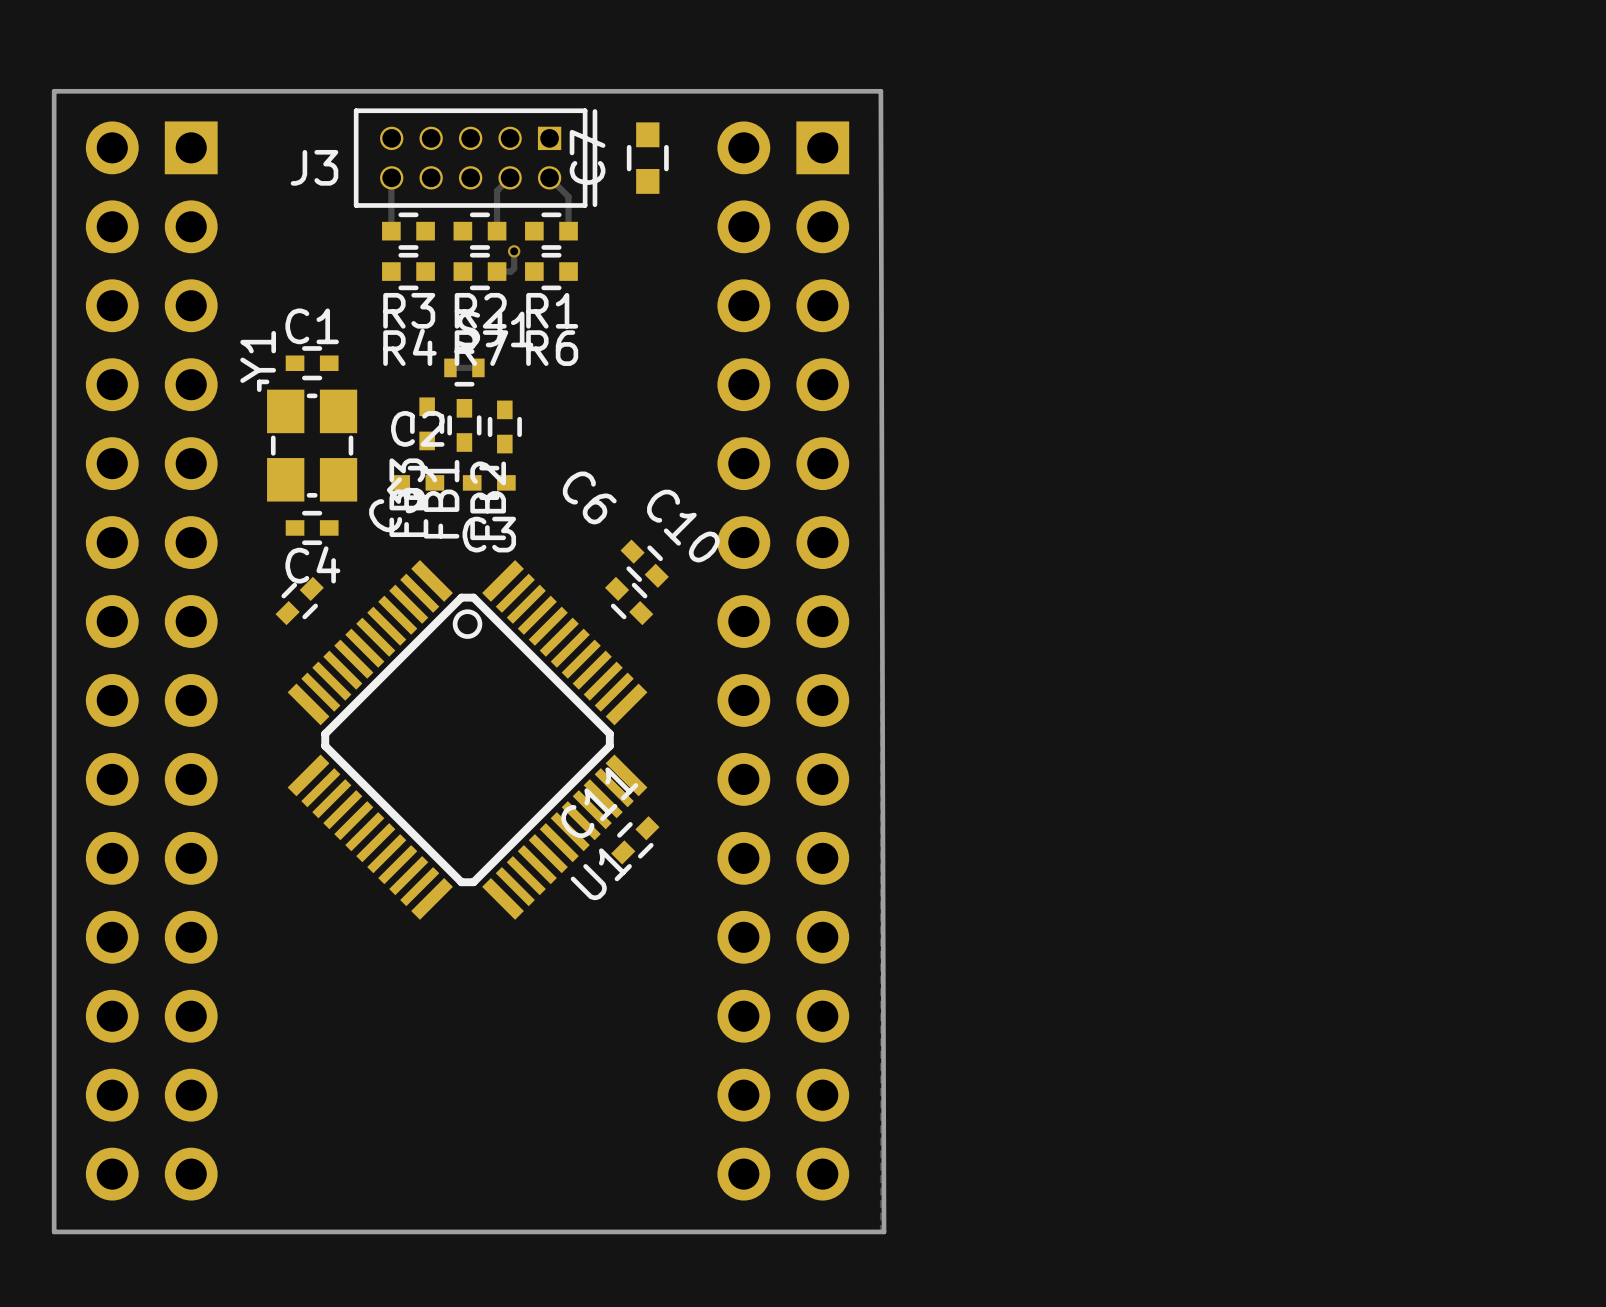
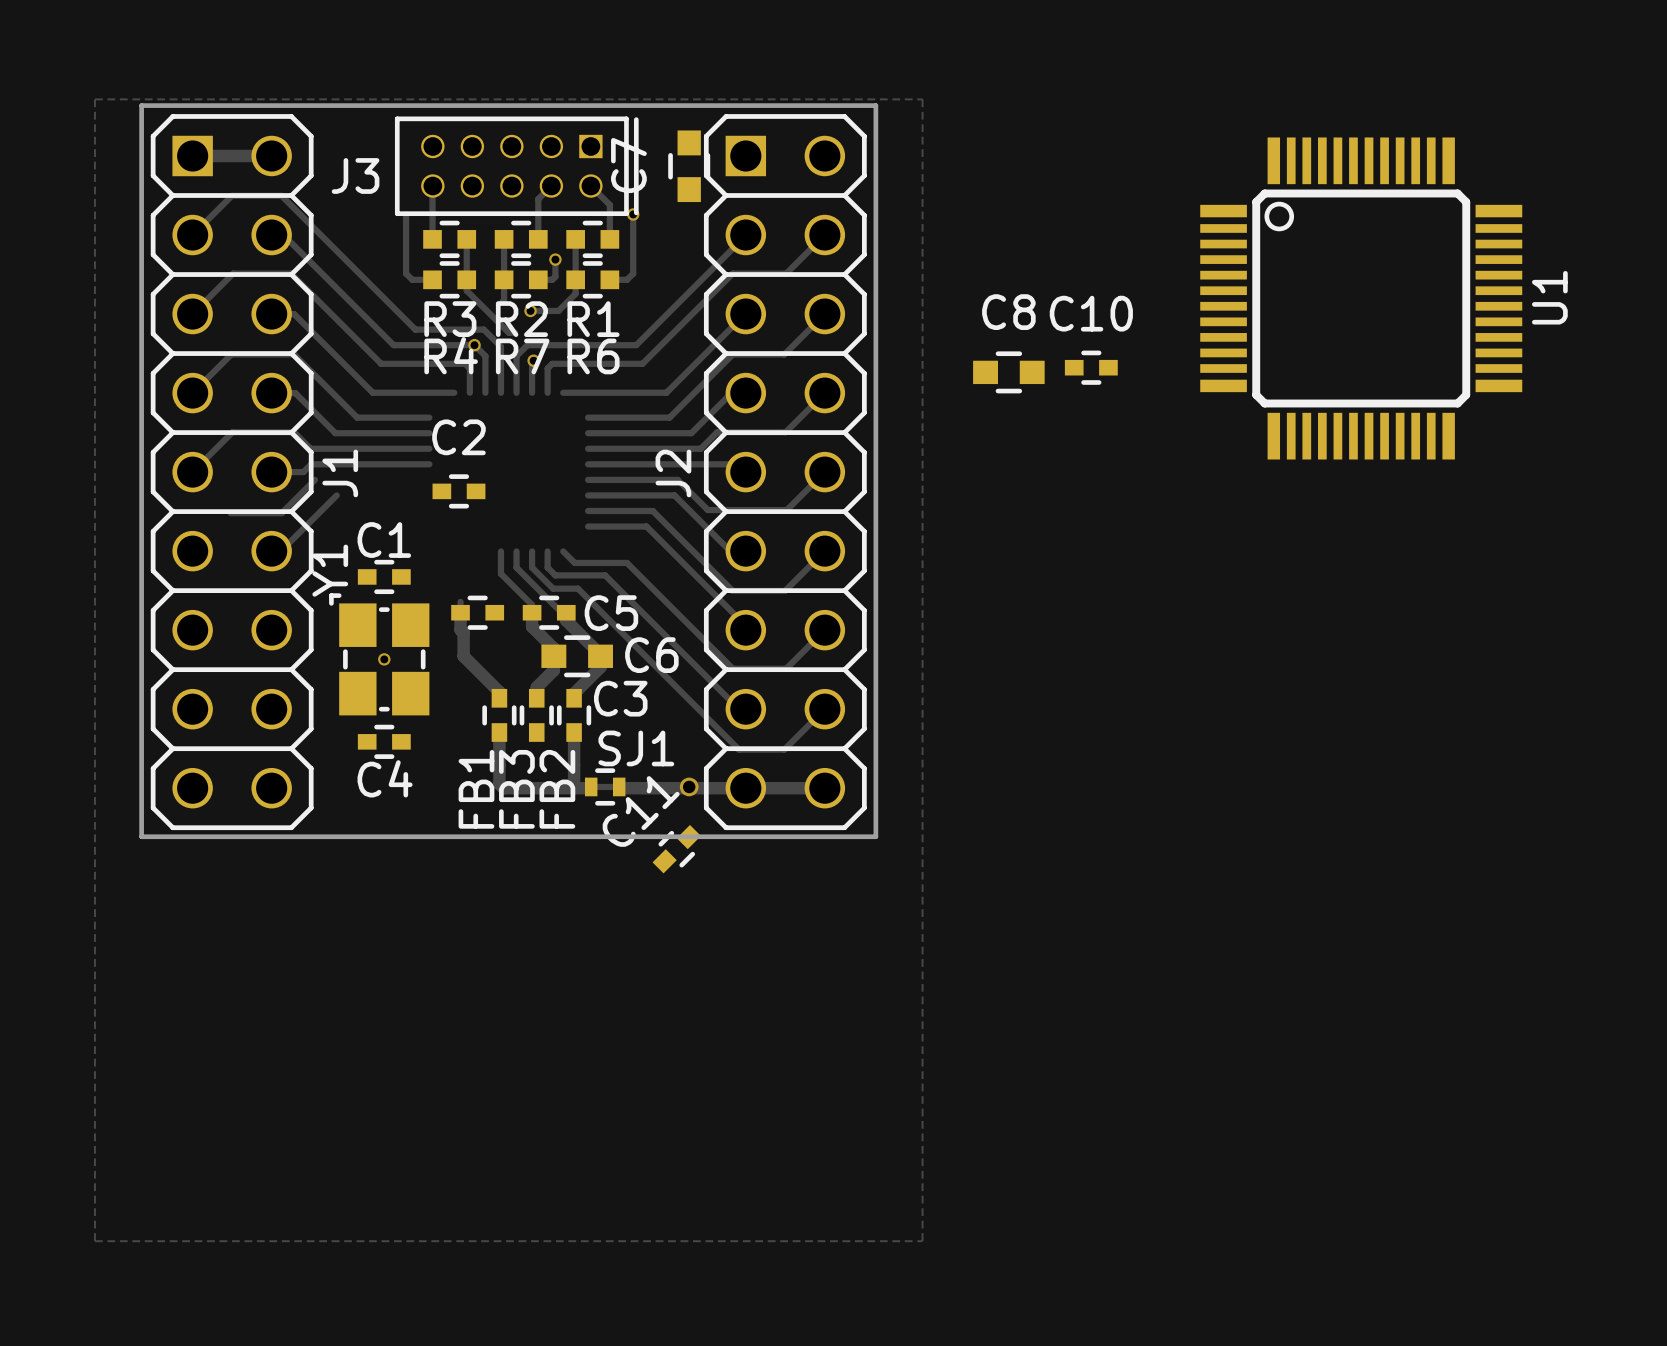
board edge: (54, 91) (54, 1231) (884, 1231) (880, 91) (54, 91) -> (141, 105) (141, 836) (875, 836) (875, 105) (141, 105)
track: none -> (192, 155) (271, 155)
track: none -> (406, 214) (406, 273) (412, 279) (432, 279)
track: none -> (633, 214) (633, 273) (626, 279) (609, 279)
via: none -> (633, 214)
track: none -> (192, 235) (231, 195) (281, 195) (415, 329) (483, 329) (500, 346) (500, 392)
track: none -> (271, 235) (283, 235) (393, 345) (474, 345) (485, 356) (485, 392)
track: none -> (824, 235) (786, 273) (732, 273) (642, 363) (552, 363) (547, 368) (547, 392)
track: none -> (745, 235) (636, 345) (527, 345) (516, 356) (516, 392)
track: none -> (466, 239) (466, 290) (508, 332) (514, 332)
track: none -> (504, 239) (504, 300) (502, 301)
track: none -> (575, 239) (575, 293) (558, 310) (530, 310)
via: none -> (530, 310)
track: none -> (192, 314) (233, 273) (290, 273) (381, 363) (465, 363) (469, 368) (469, 392)
track: none -> (271, 314) (294, 314) (372, 392) (454, 392)
track: none -> (745, 314) (666, 392) (563, 392)
track: none -> (824, 314) (784, 354) (732, 354) (669, 417) (588, 417)
via: none -> (474, 345)
track: none -> (533, 360) (532, 392)
via: none -> (533, 360)
C1 position: (312, 363) -> (384, 576)
C8: none -> (1008, 372)
SJ1 position: (464, 367) -> (605, 786)
track: none -> (192, 393) (231, 354) (294, 354) (357, 417) (429, 417)
track: none -> (271, 393) (295, 393) (335, 433) (429, 433)
track: none -> (745, 393) (731, 393) (691, 433) (588, 433)
track: none -> (824, 393) (785, 432) (717, 432) (700, 448) (588, 448)
FB3 position: (427, 423) -> (536, 715)
FB1 position: (464, 425) -> (499, 715)
FB2 position: (504, 426) -> (574, 715)
Y1 position: (307, 440) -> (379, 654)
track: none -> (429, 448) (310, 448) (294, 432) (232, 432) (192, 472)
track: none -> (429, 464) (311, 464) (303, 472) (271, 472)
track: none -> (588, 464) (738, 464) (745, 472)
J1: none -> (232, 472)
J2: none -> (785, 472)
track: none -> (824, 472) (786, 510) (707, 510) (677, 479) (588, 479)
C3 footprint: [462, 465, 516, 500] -> [541, 635, 613, 678]
track: none -> (314, 479) (281, 513) (230, 513)
track: none -> (336, 495) (281, 551) (271, 551)
track: none -> (588, 495) (674, 495) (730, 551) (745, 551)
C6 name position: C6 (589, 497) -> C6 (651, 655)
track: none -> (588, 510) (652, 510) (732, 590) (785, 590) (824, 551)
track: none -> (588, 526) (646, 526) (745, 625) (745, 630)
C4 position: (312, 527) -> (384, 741)
track: none -> (500, 551) (500, 573) (532, 604) (532, 626) (553, 648) (553, 670) (536, 687) (536, 698)
track: none -> (516, 551) (516, 567) (561, 612) (566, 612) (566, 620) (600, 654) (600, 667) (574, 693) (574, 698)
track: none -> (532, 551) (532, 567) (553, 588) (578, 588) (738, 749) (784, 749) (824, 709)
track: none -> (547, 551) (547, 567) (555, 575) (605, 575) (738, 709) (745, 709)
track: none -> (563, 551) (574, 562) (626, 562) (732, 668) (786, 668) (824, 630)
C10 rotation: 0° (644, 563) -> 45° counterclockwise (1091, 367)
C10 position: (644, 563) -> (1091, 367)
track: none -> (460, 601) (460, 629) (463, 632) (463, 656) (499, 692) (499, 698)
C5 rotation: 0° (299, 601) -> 45° clockwise (477, 612)
C5 position: (299, 601) -> (477, 612)
C6 rotation: 0° (629, 601) -> 45° counterclockwise (549, 612)
C6 position: (629, 601) -> (549, 612)
via: none -> (384, 659)
part: (151, 660) -> none
part: (783, 660) -> none
track: none -> (499, 732) (499, 783) (503, 788) (591, 786)
track: none -> (574, 732) (574, 788)
U1 rotation: 0° (467, 739) -> 45° counterclockwise (1361, 298)
U1 position: (467, 739) -> (1361, 298)
track: none -> (619, 786) (824, 788)
via: none -> (689, 786)

